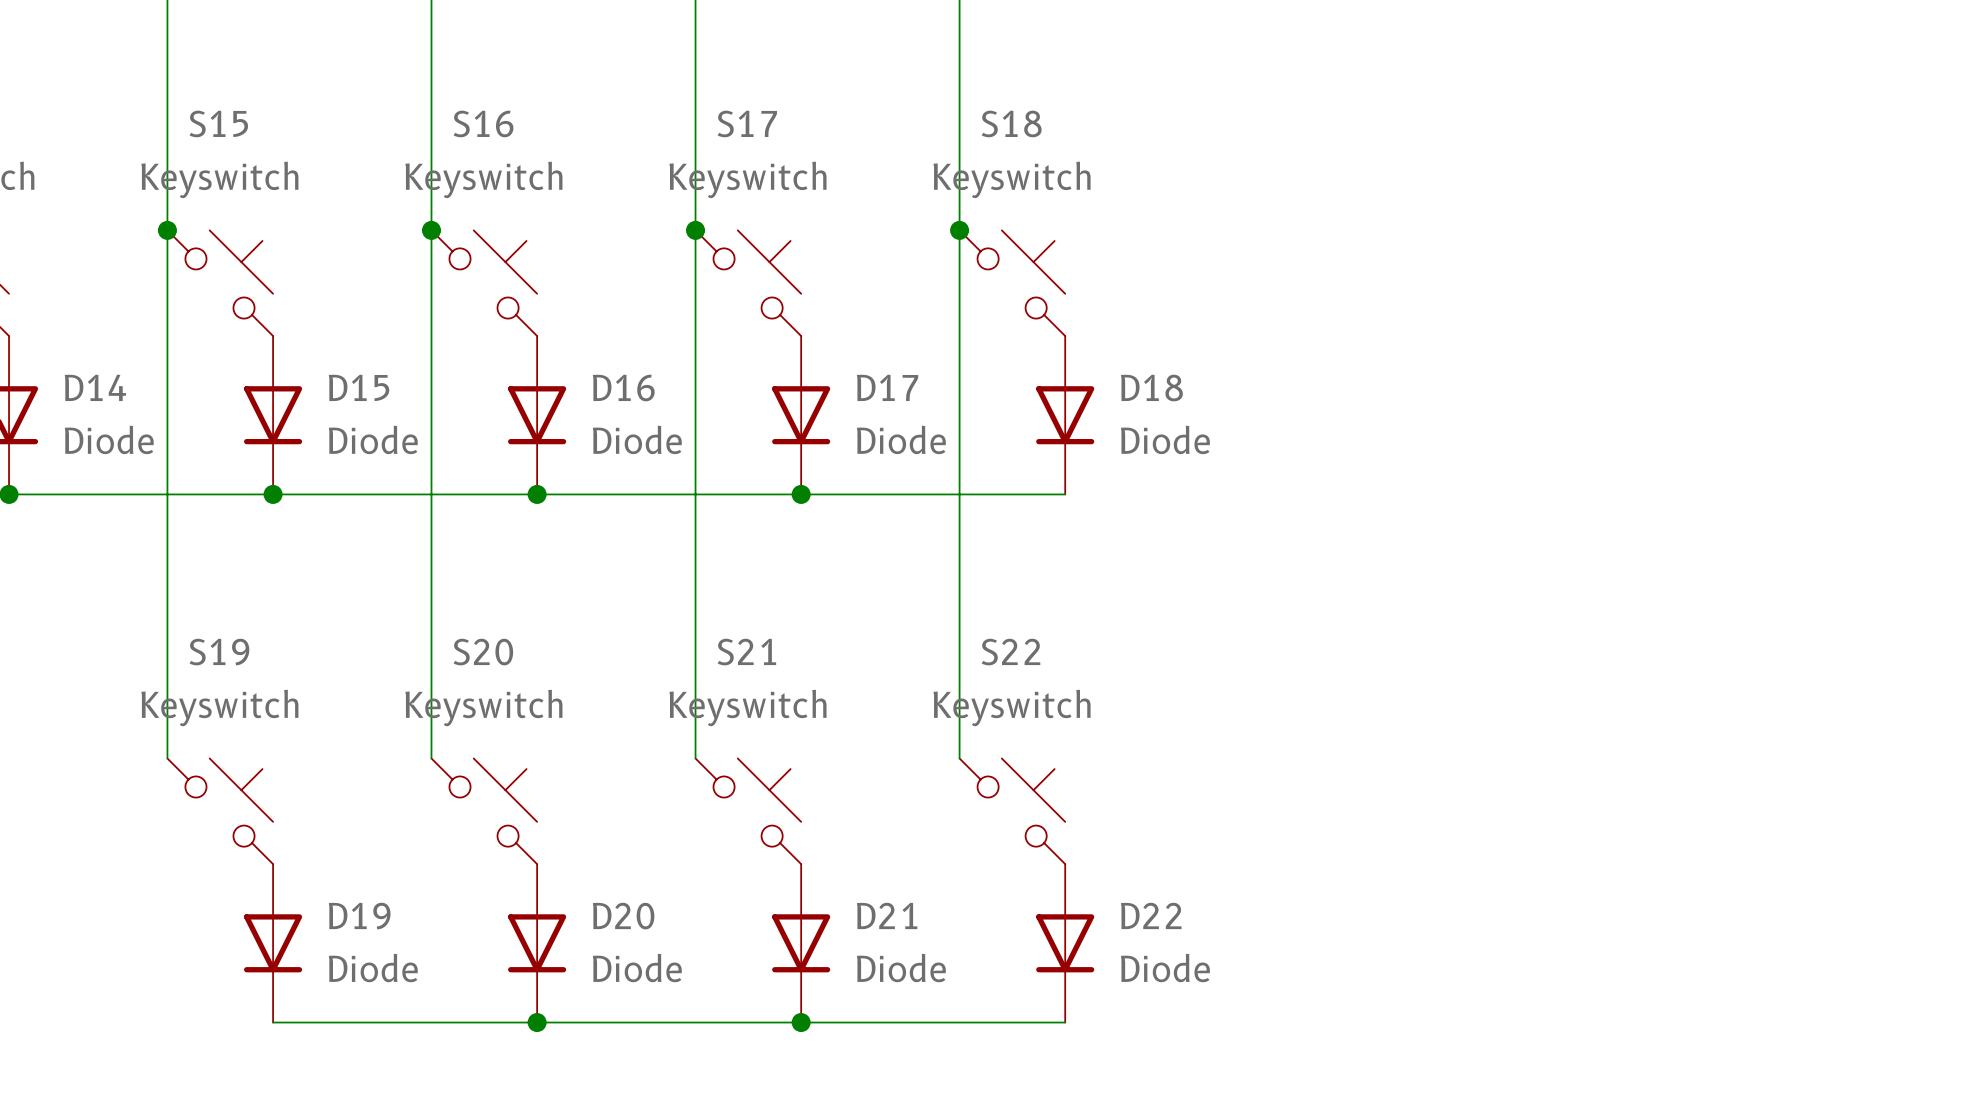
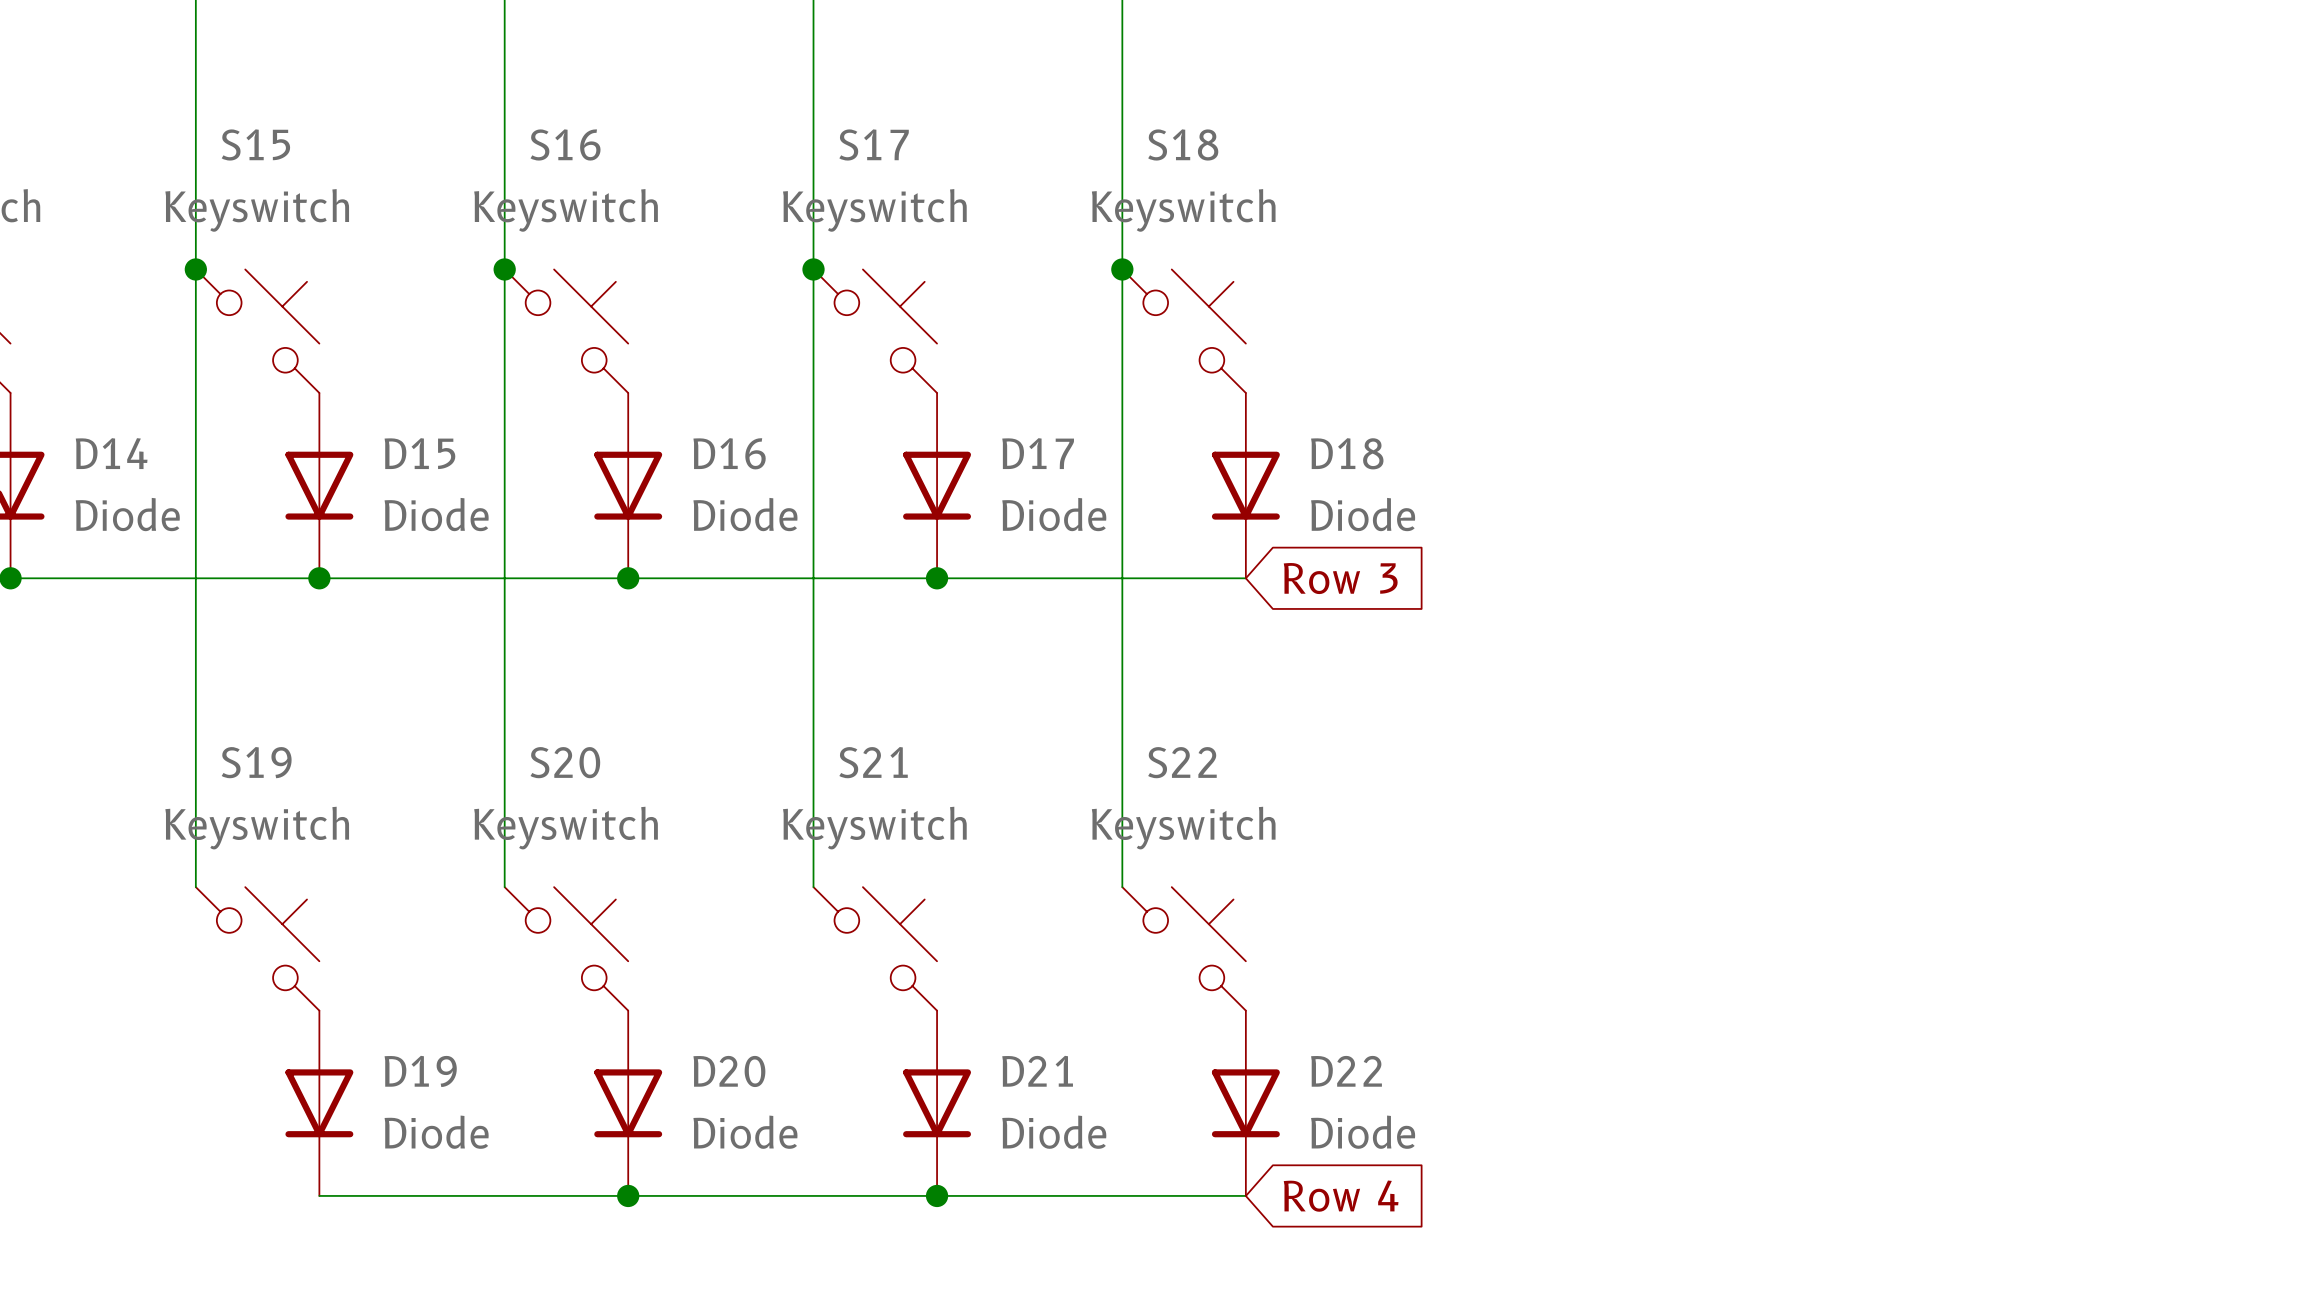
global label: none -> Row 3 (1340, 578)
global label: none -> Row 4 (1341, 1196)

